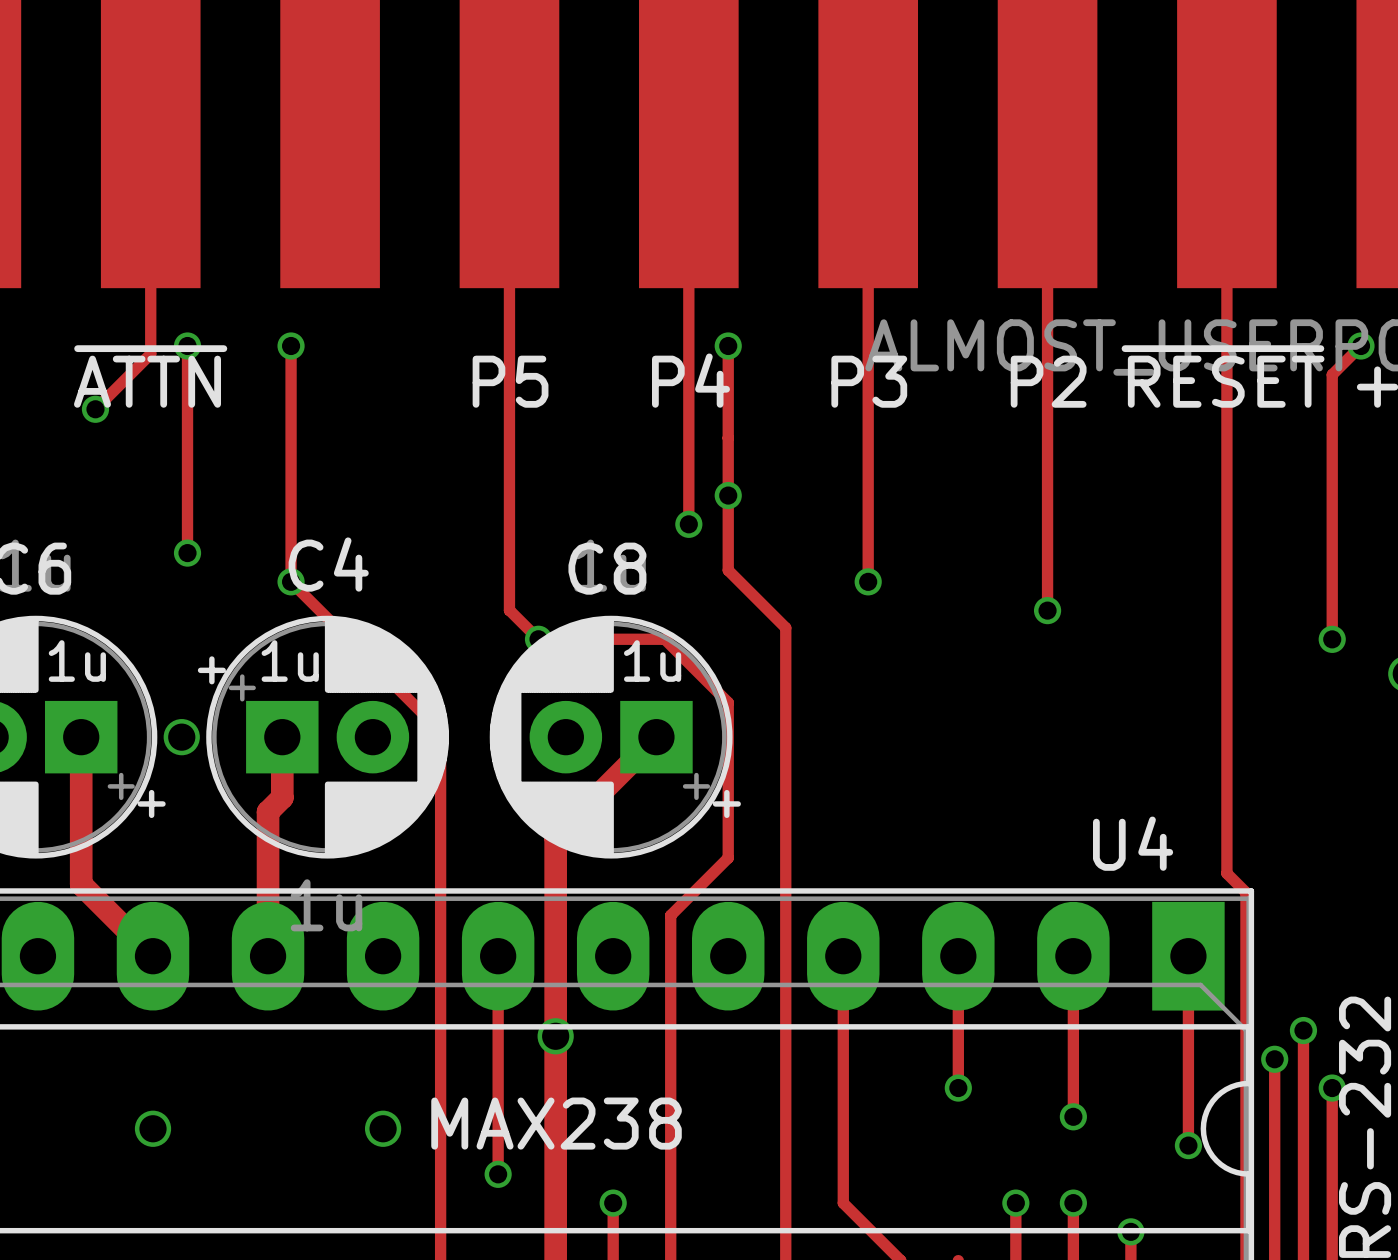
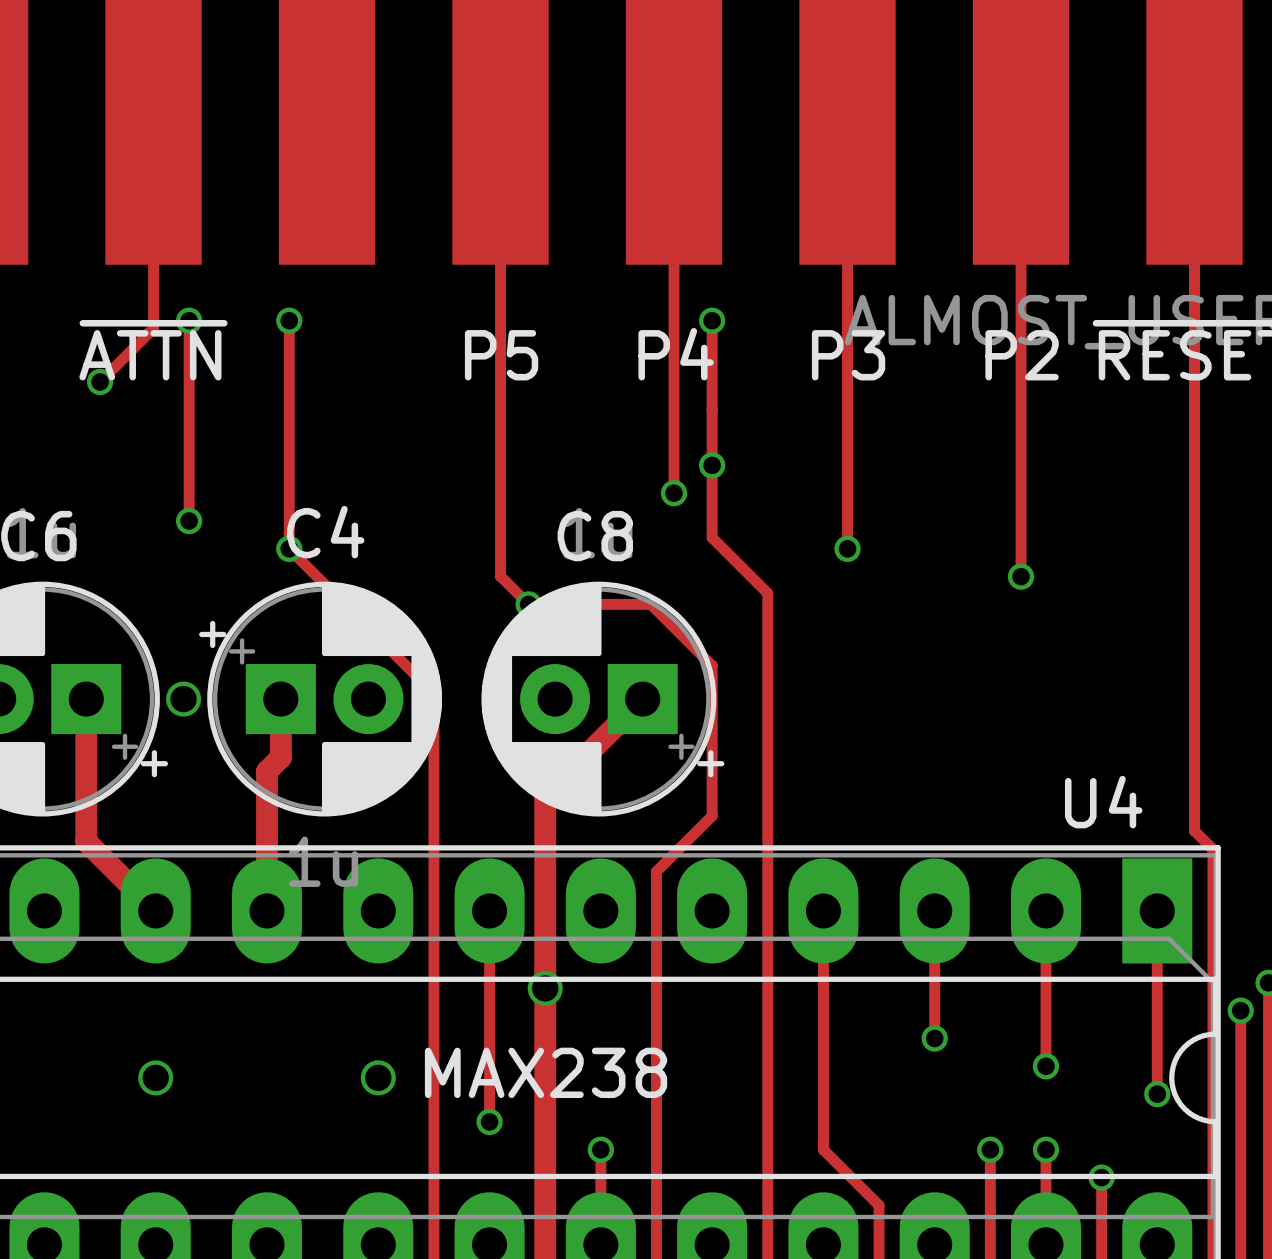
text: 1u (77, 661) -> none
text: 1u (290, 661) -> none
text: 1u (652, 661) -> none

